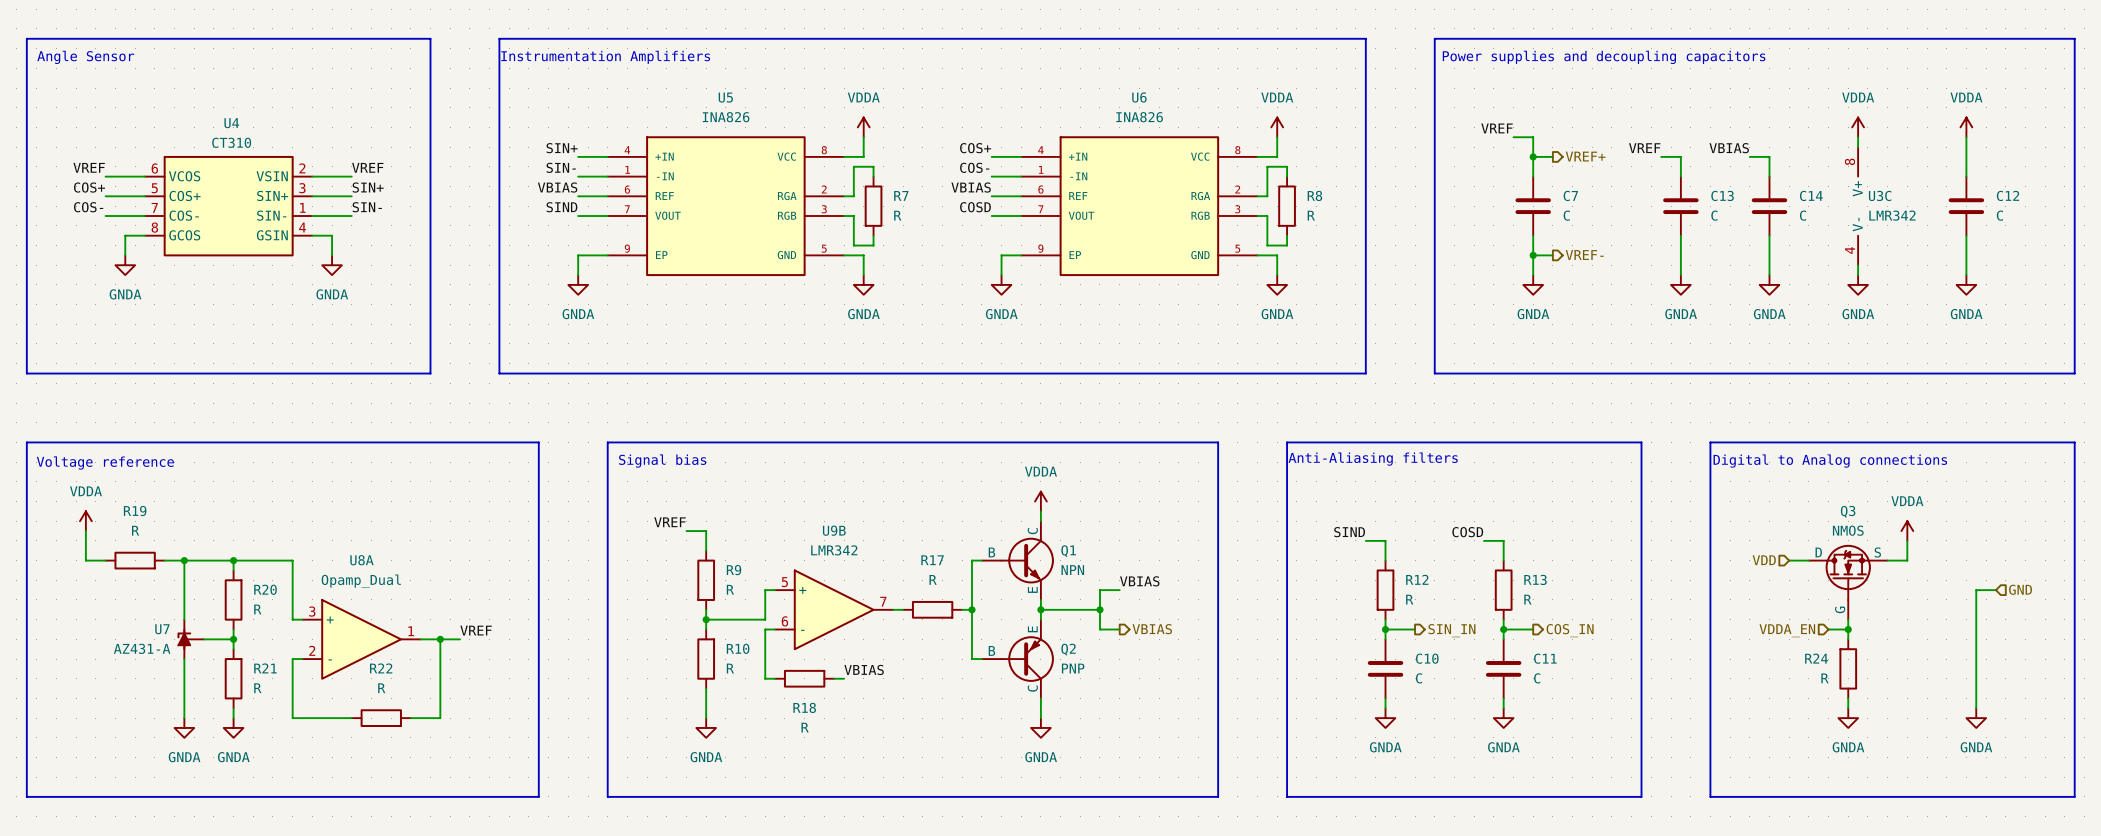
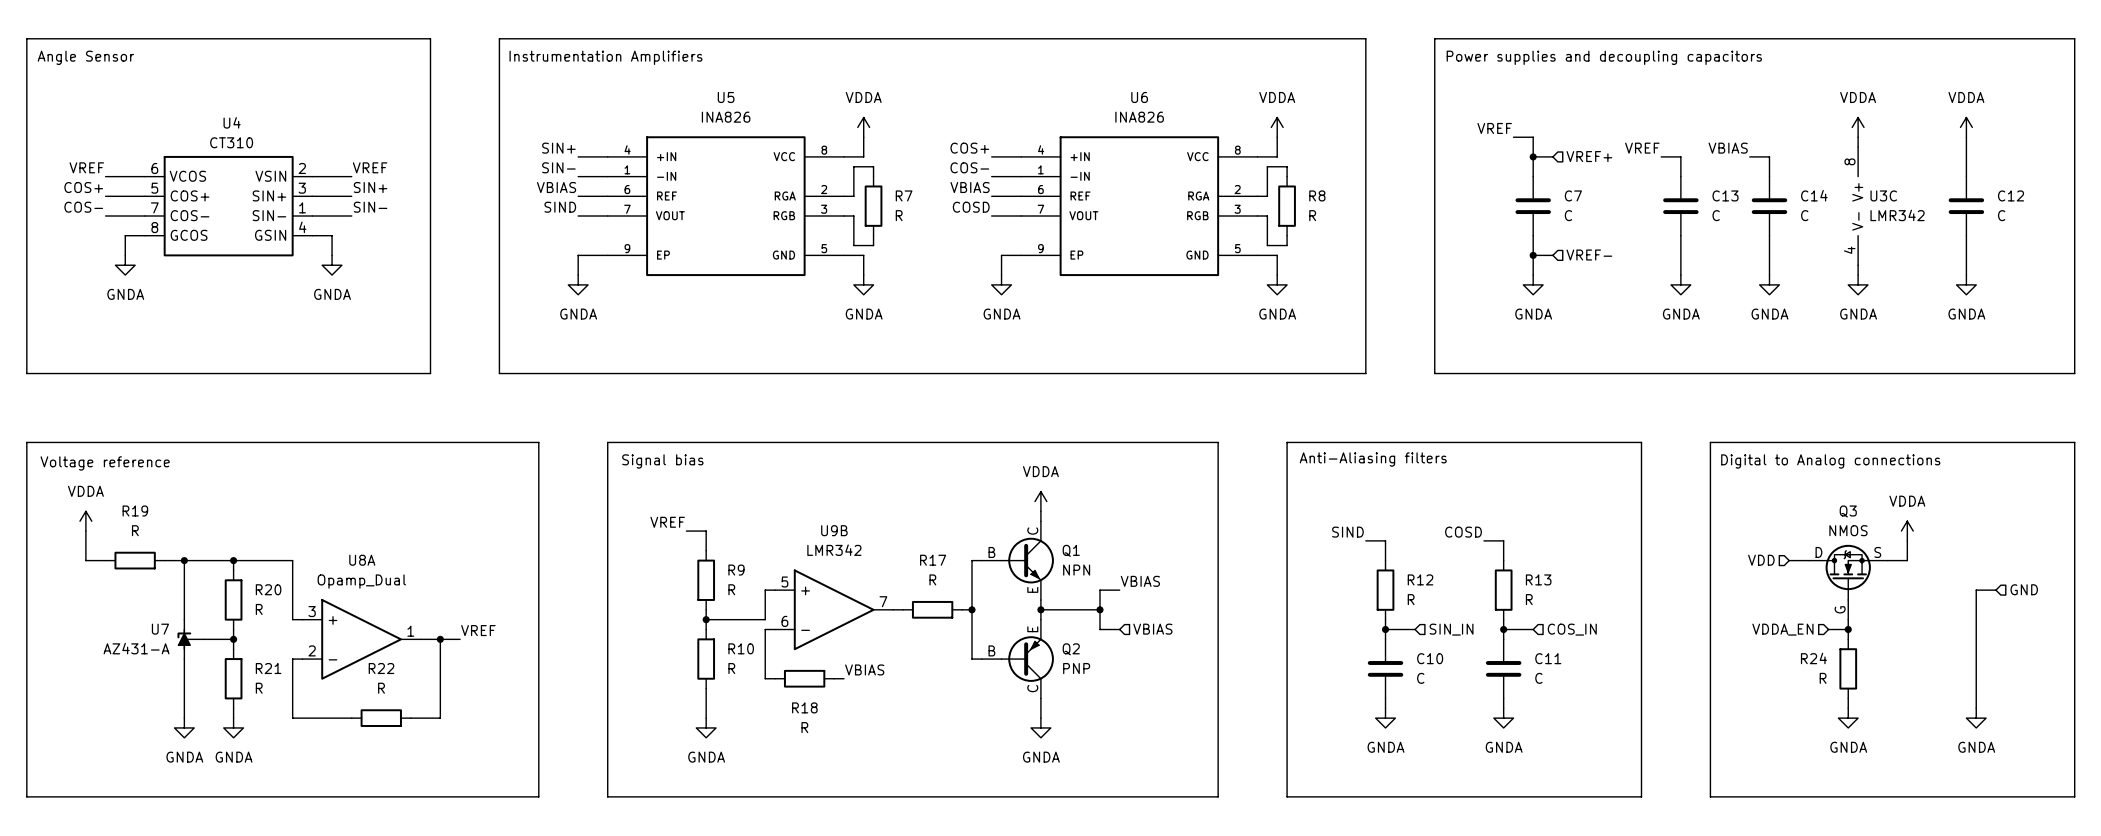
hierarchical label shape: output (1585, 156) -> input (1589, 156)
hierarchical label shape: output (1584, 255) -> input (1589, 255)
hierarchical label shape: output (1152, 629) -> input (1152, 629)
hierarchical label shape: output (1451, 630) -> input (1451, 629)
hierarchical label shape: output (1570, 630) -> input (1572, 629)

